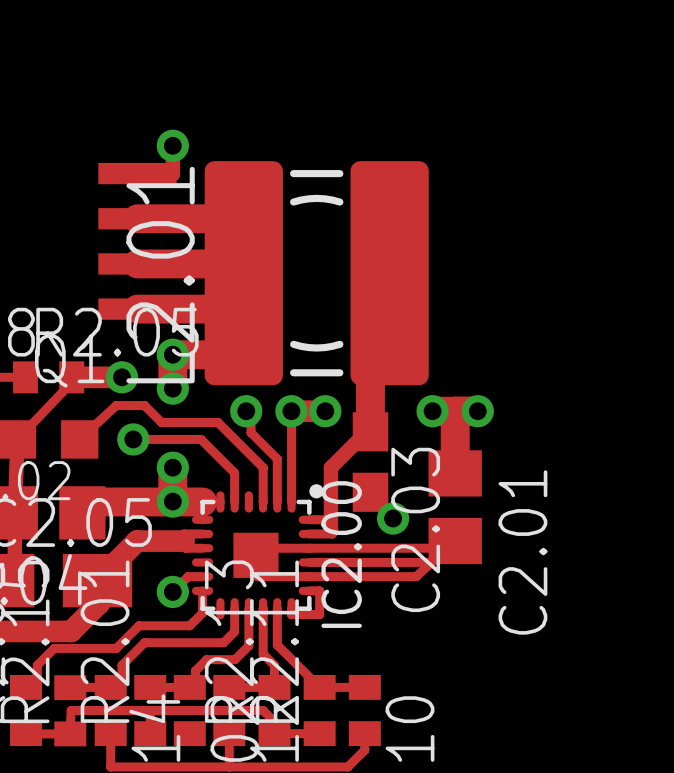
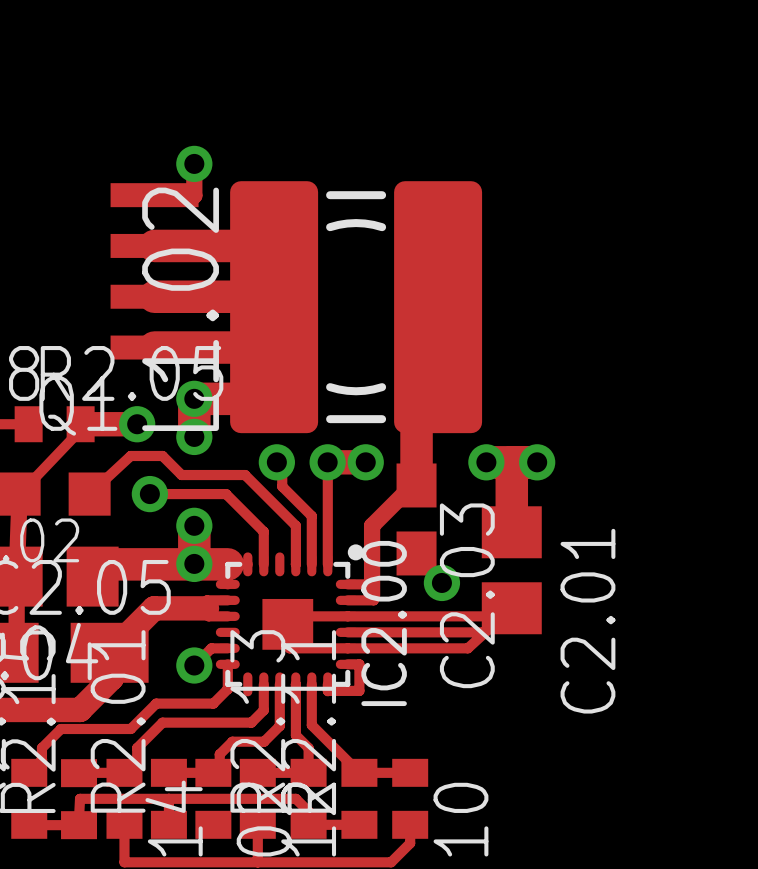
L2.01 name: L2.01 (160, 275) -> L1.02 (180, 309)

